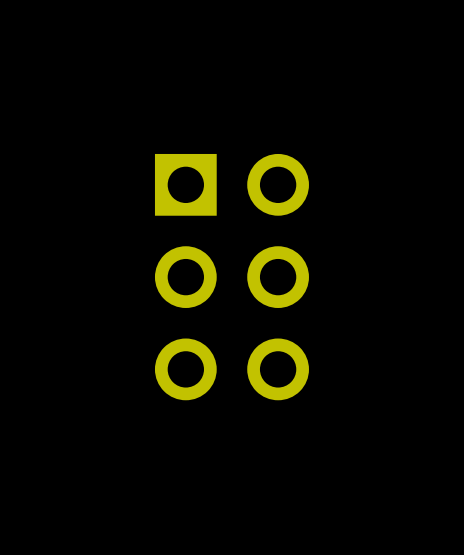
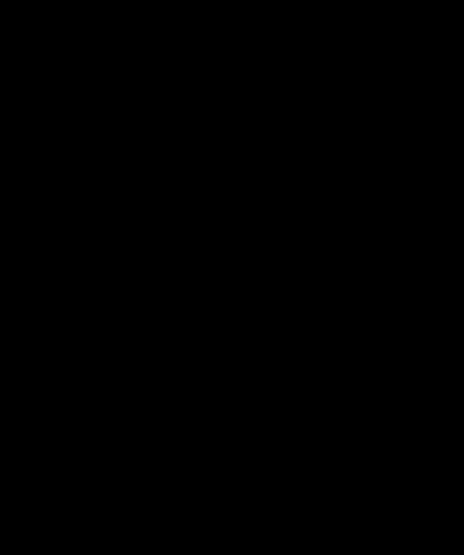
part: (231, 277) -> none

